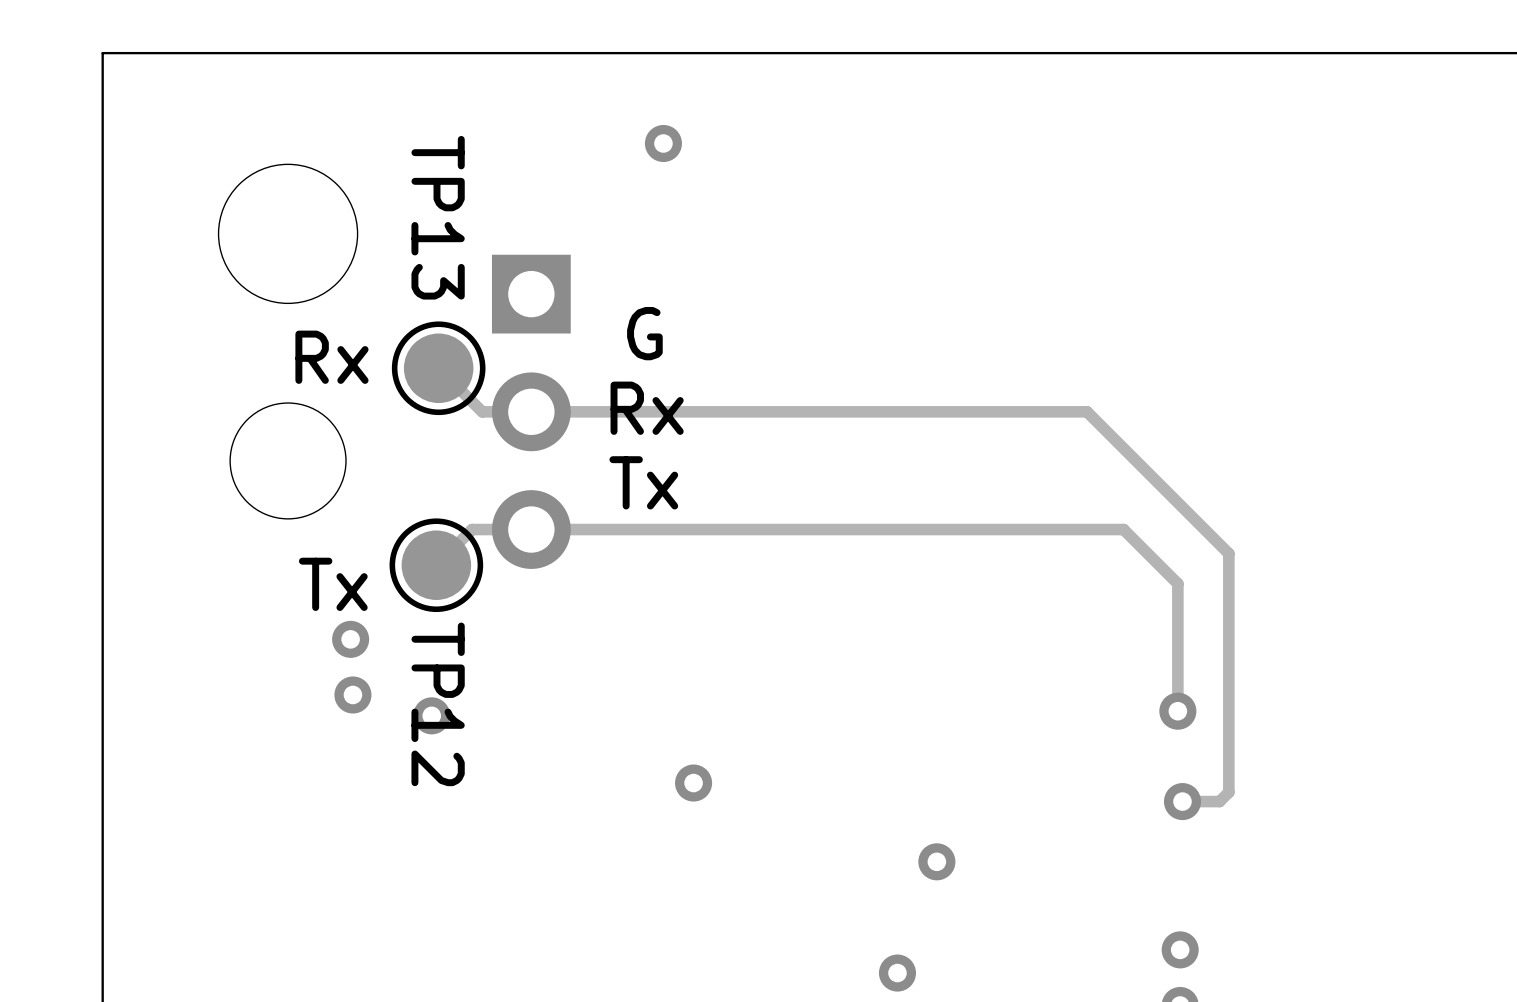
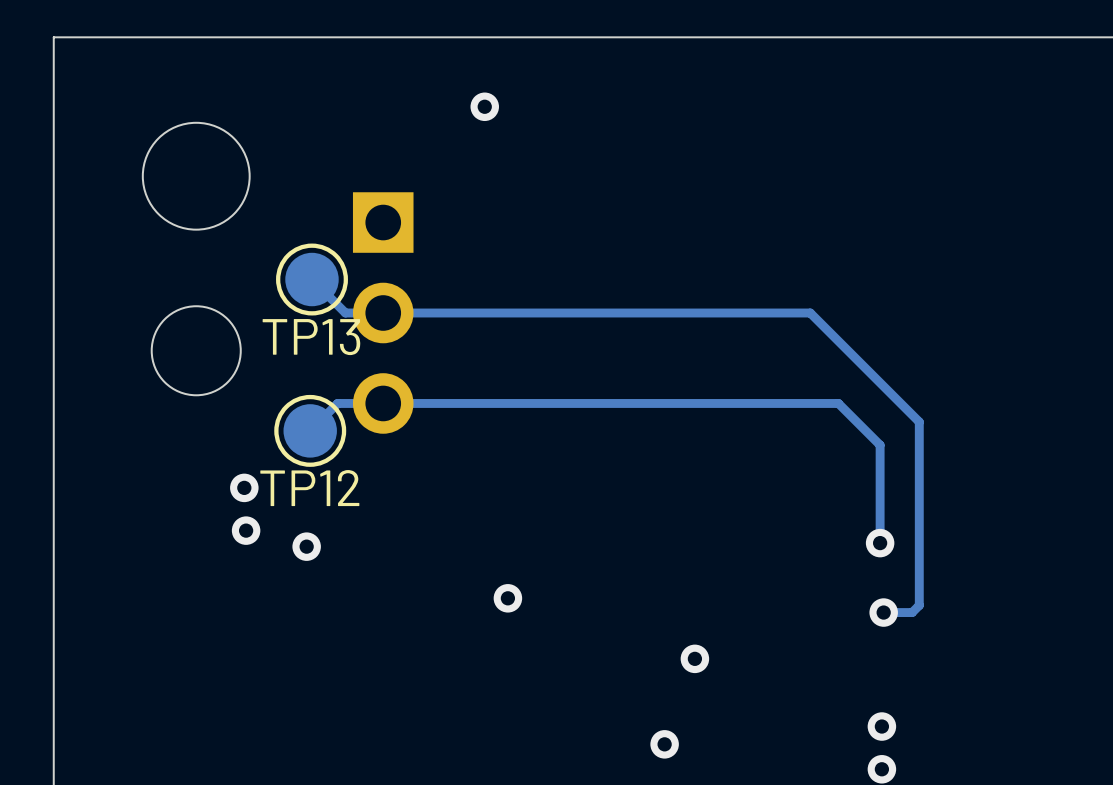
TP13 name rotation: 0° (438, 217) -> 90° counterclockwise (311, 337)
TP13 name position: TP13 (438, 217) -> TP13 (311, 337)
text: G (644, 333) -> none
text: Rx (331, 357) -> none
text: Rx (647, 408) -> none
text: Tx (643, 482) -> none
text: Tx (333, 584) -> none
TP12 name rotation: 0° (438, 704) -> 90° counterclockwise (309, 488)

